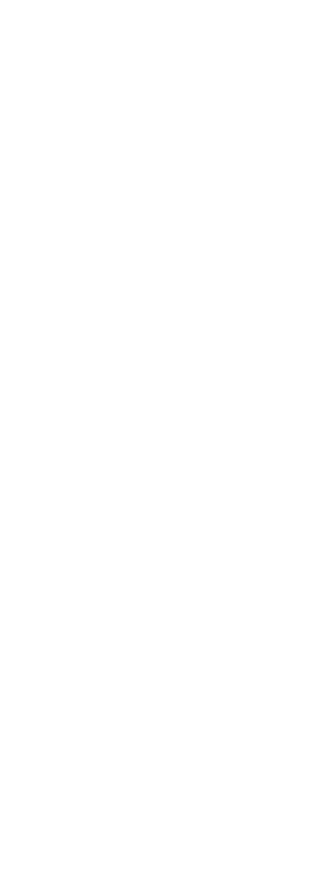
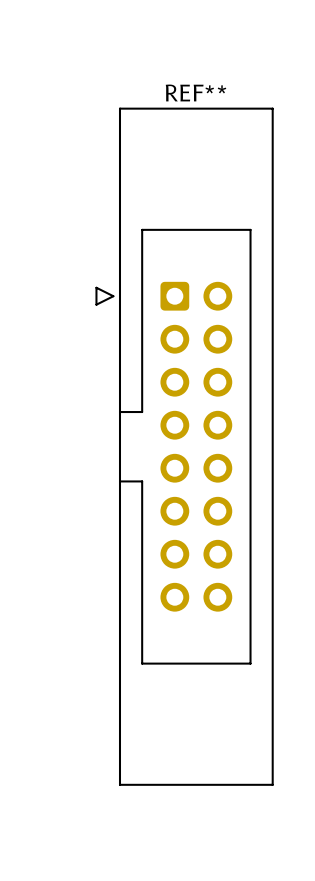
REF**: none -> (184, 446)

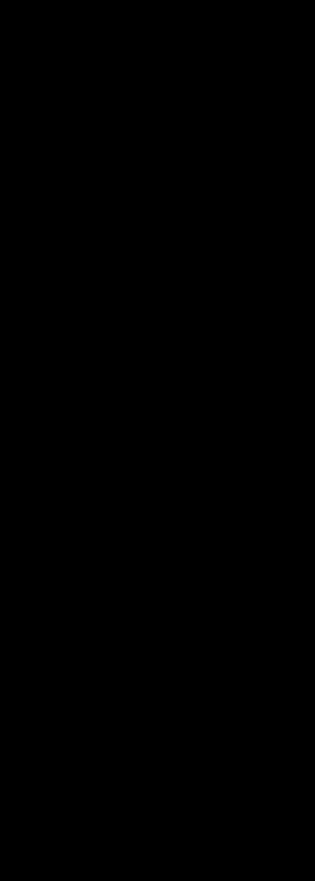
REF**: (184, 446) -> none

